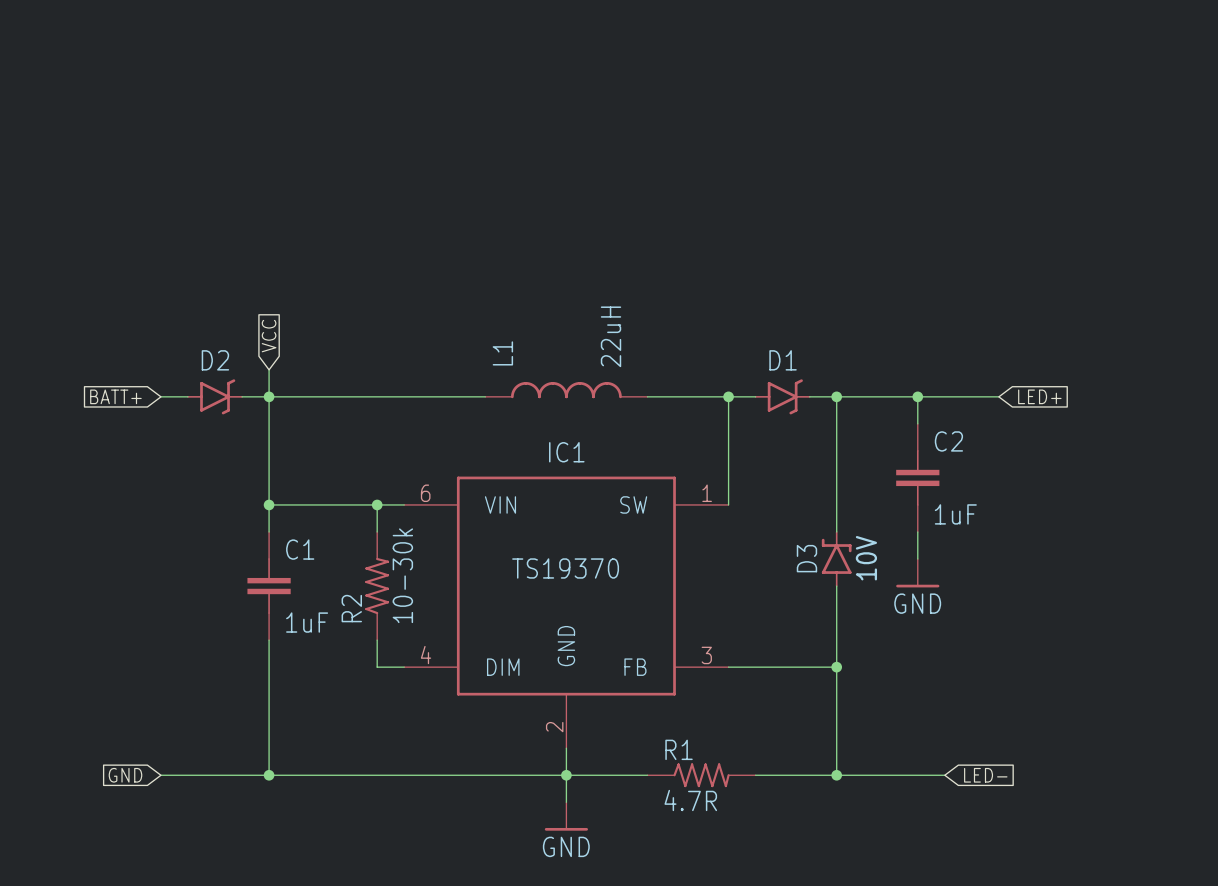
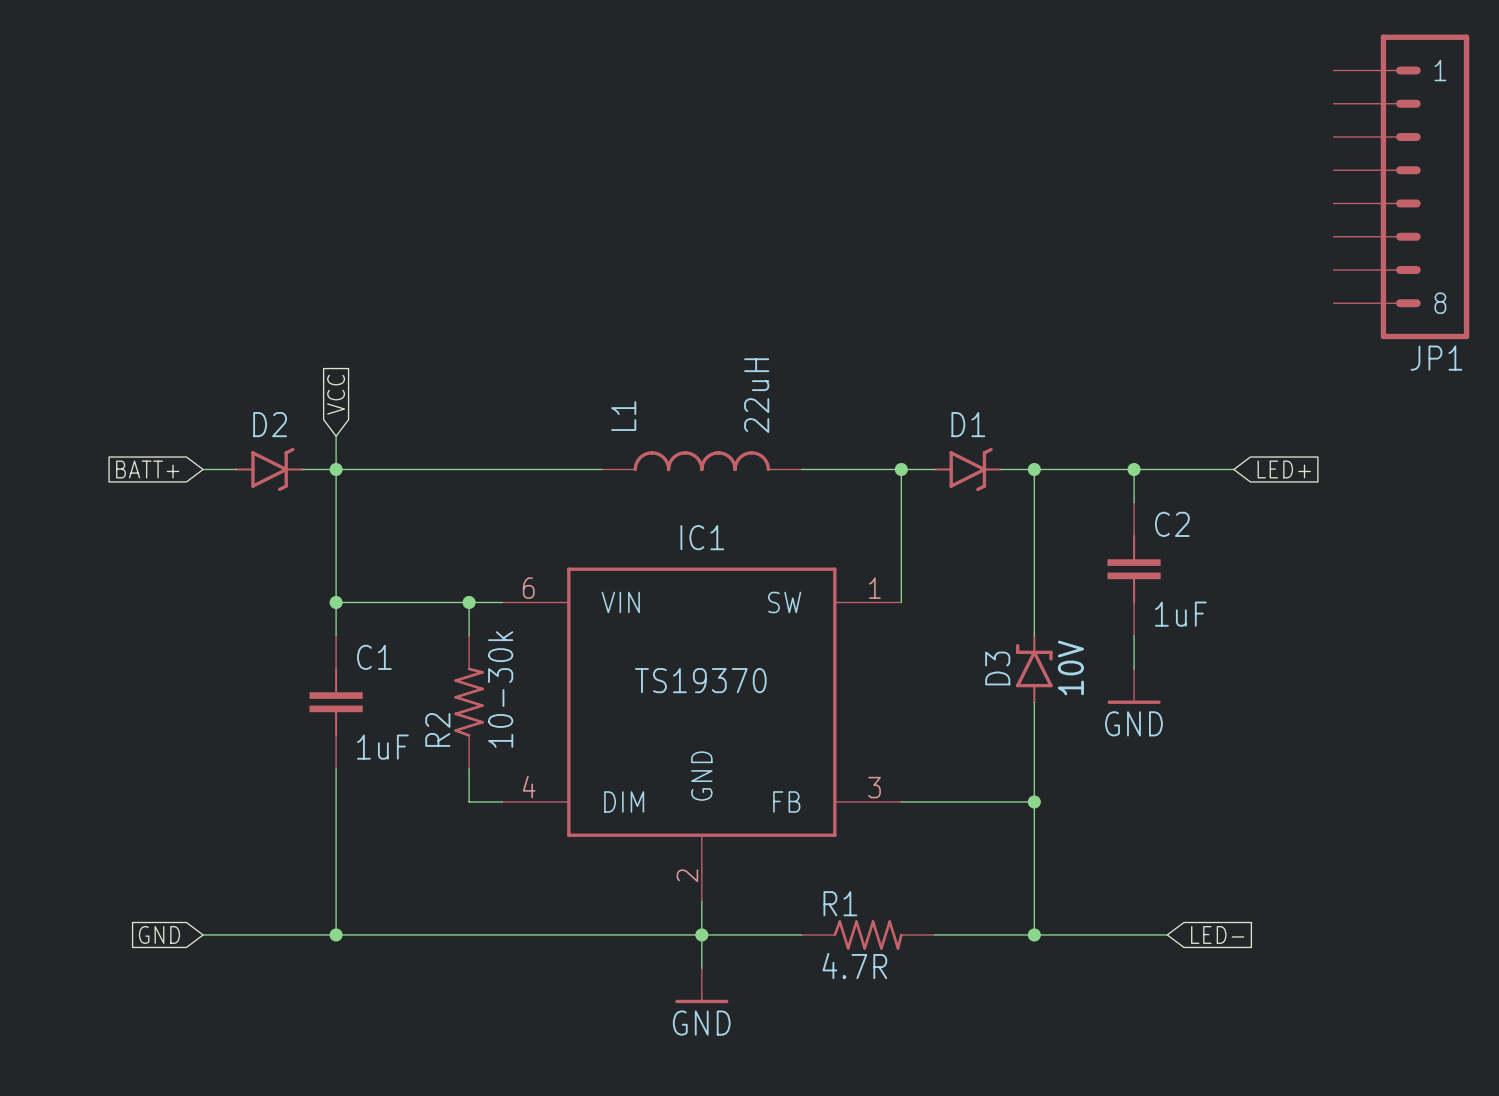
JP1: none -> (1401, 186)

